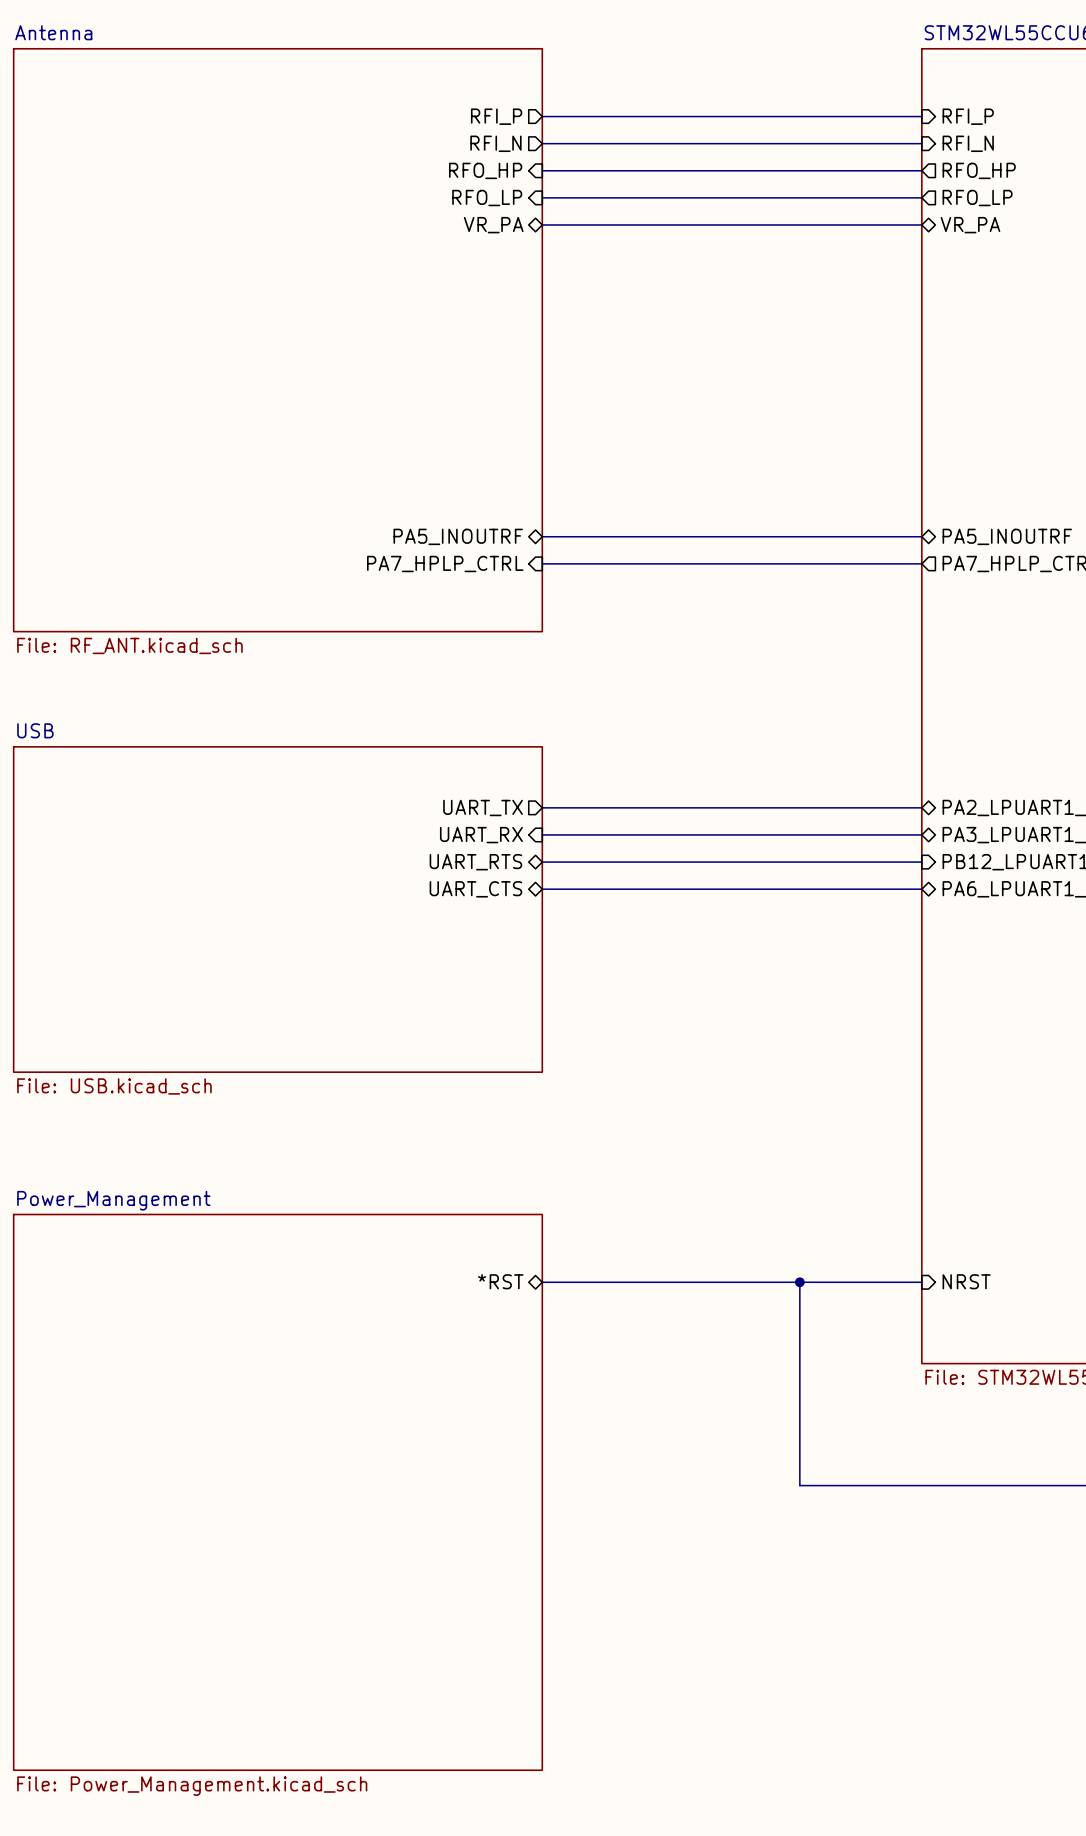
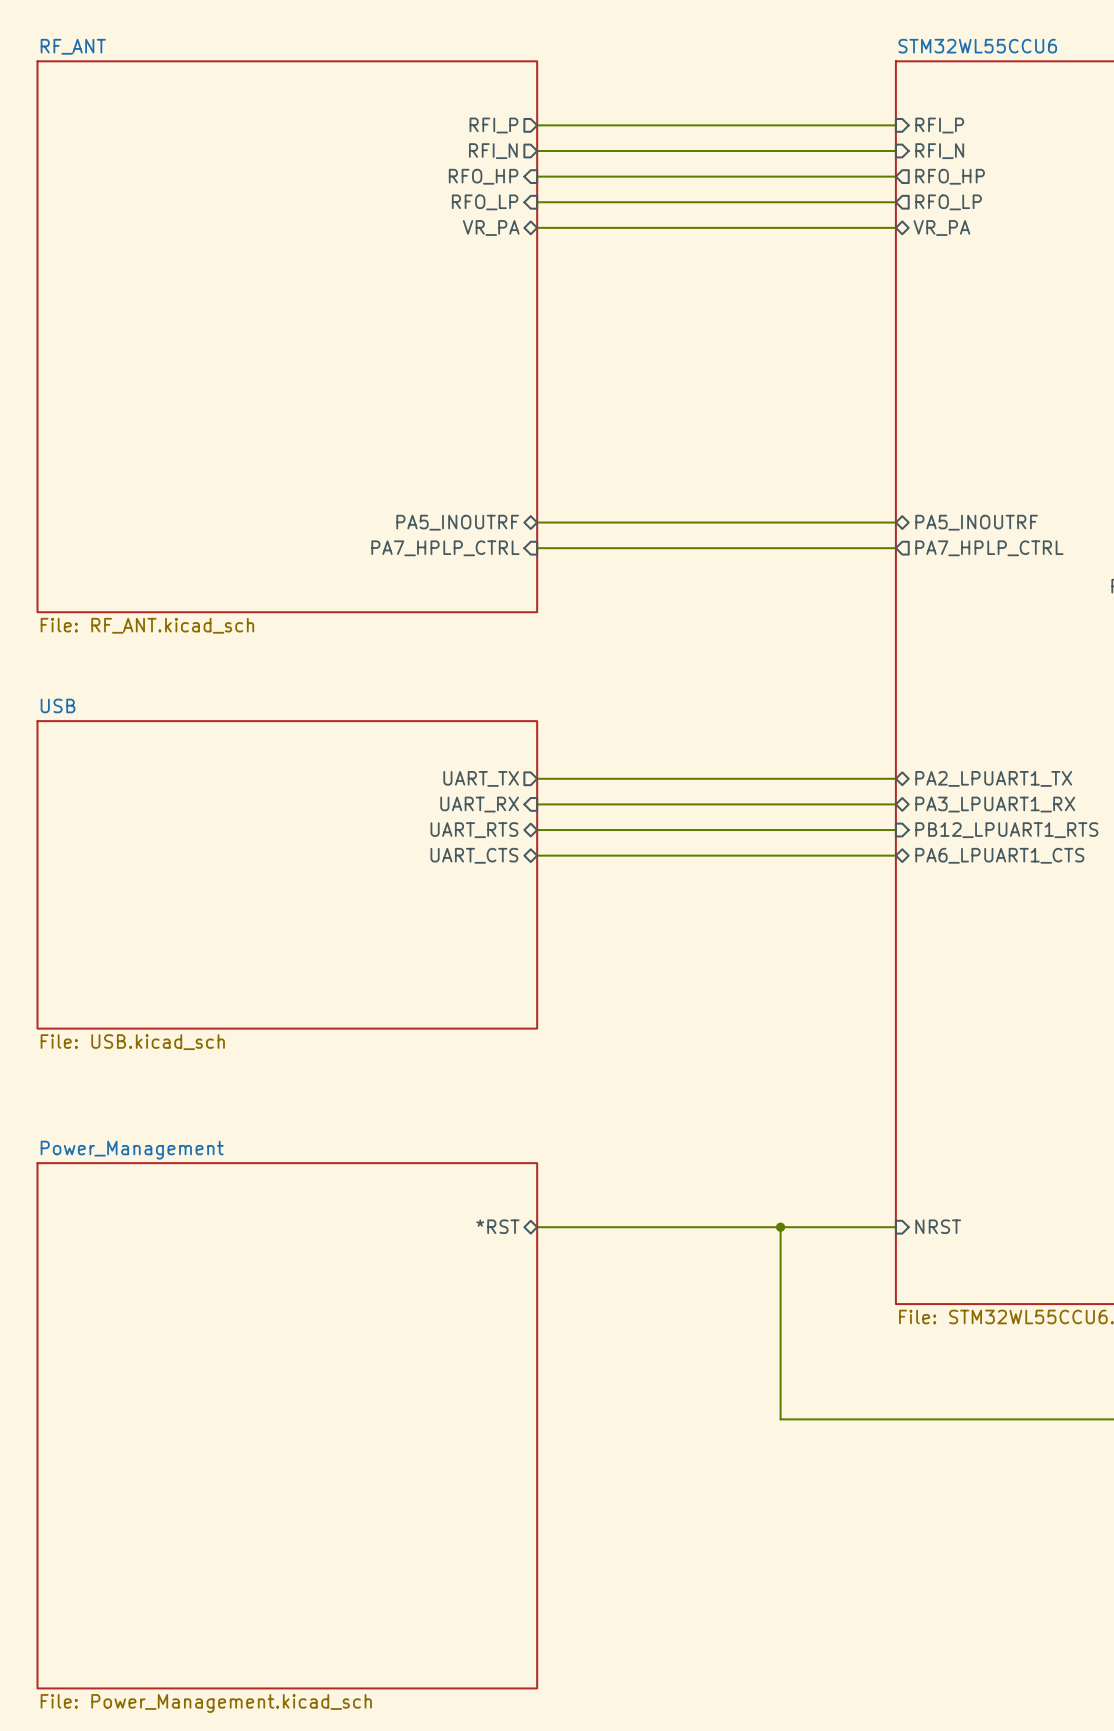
sheet Antenna name: Antenna (53, 32) -> RF_ANT (73, 46)

